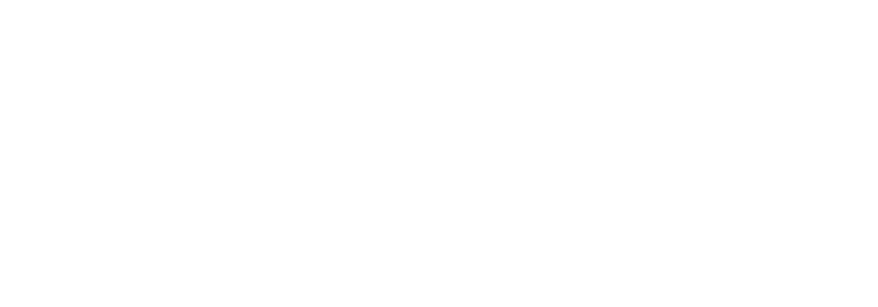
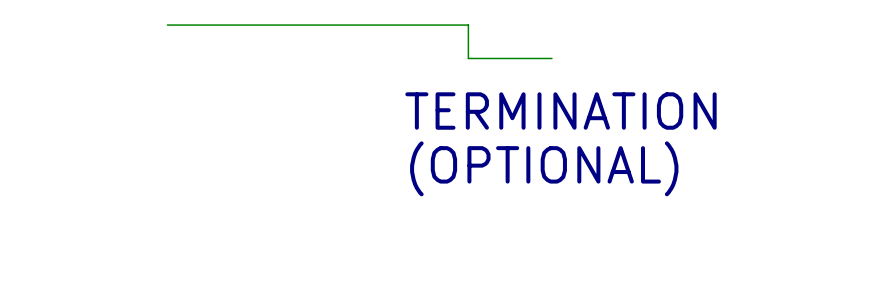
wire: none -> (167, 25) (468, 25) (468, 58) (551, 58)
text: none -> TERMINATION (560, 111)
text: none -> (OPTIONAL) (544, 168)

